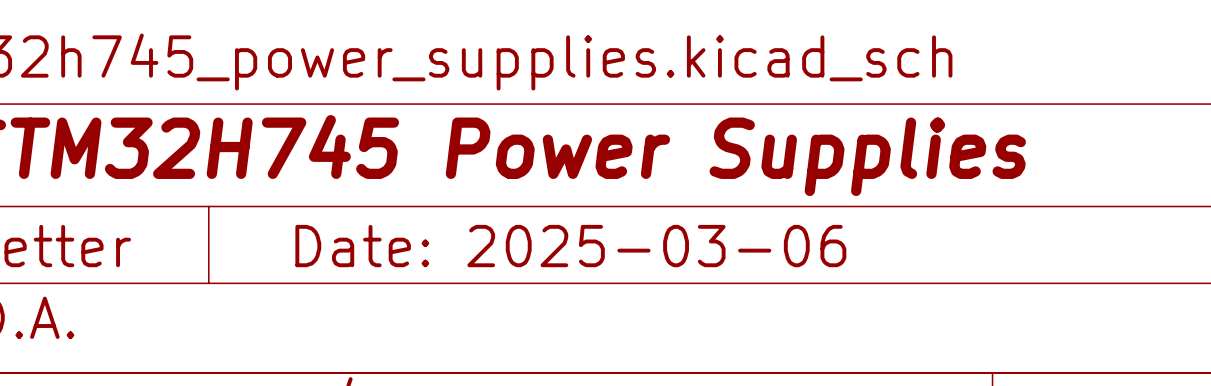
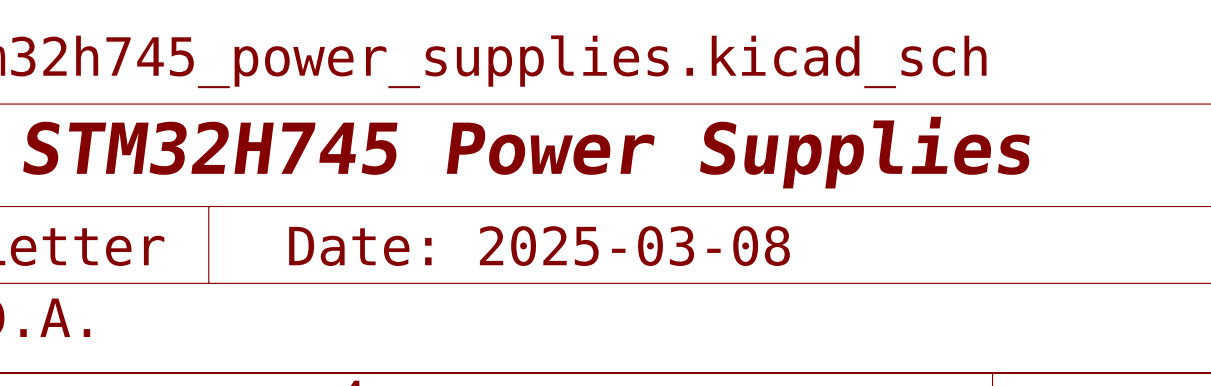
title block: Date: 2025-03-06 (570, 246) -> Date: 2025-03-08 (539, 246)

